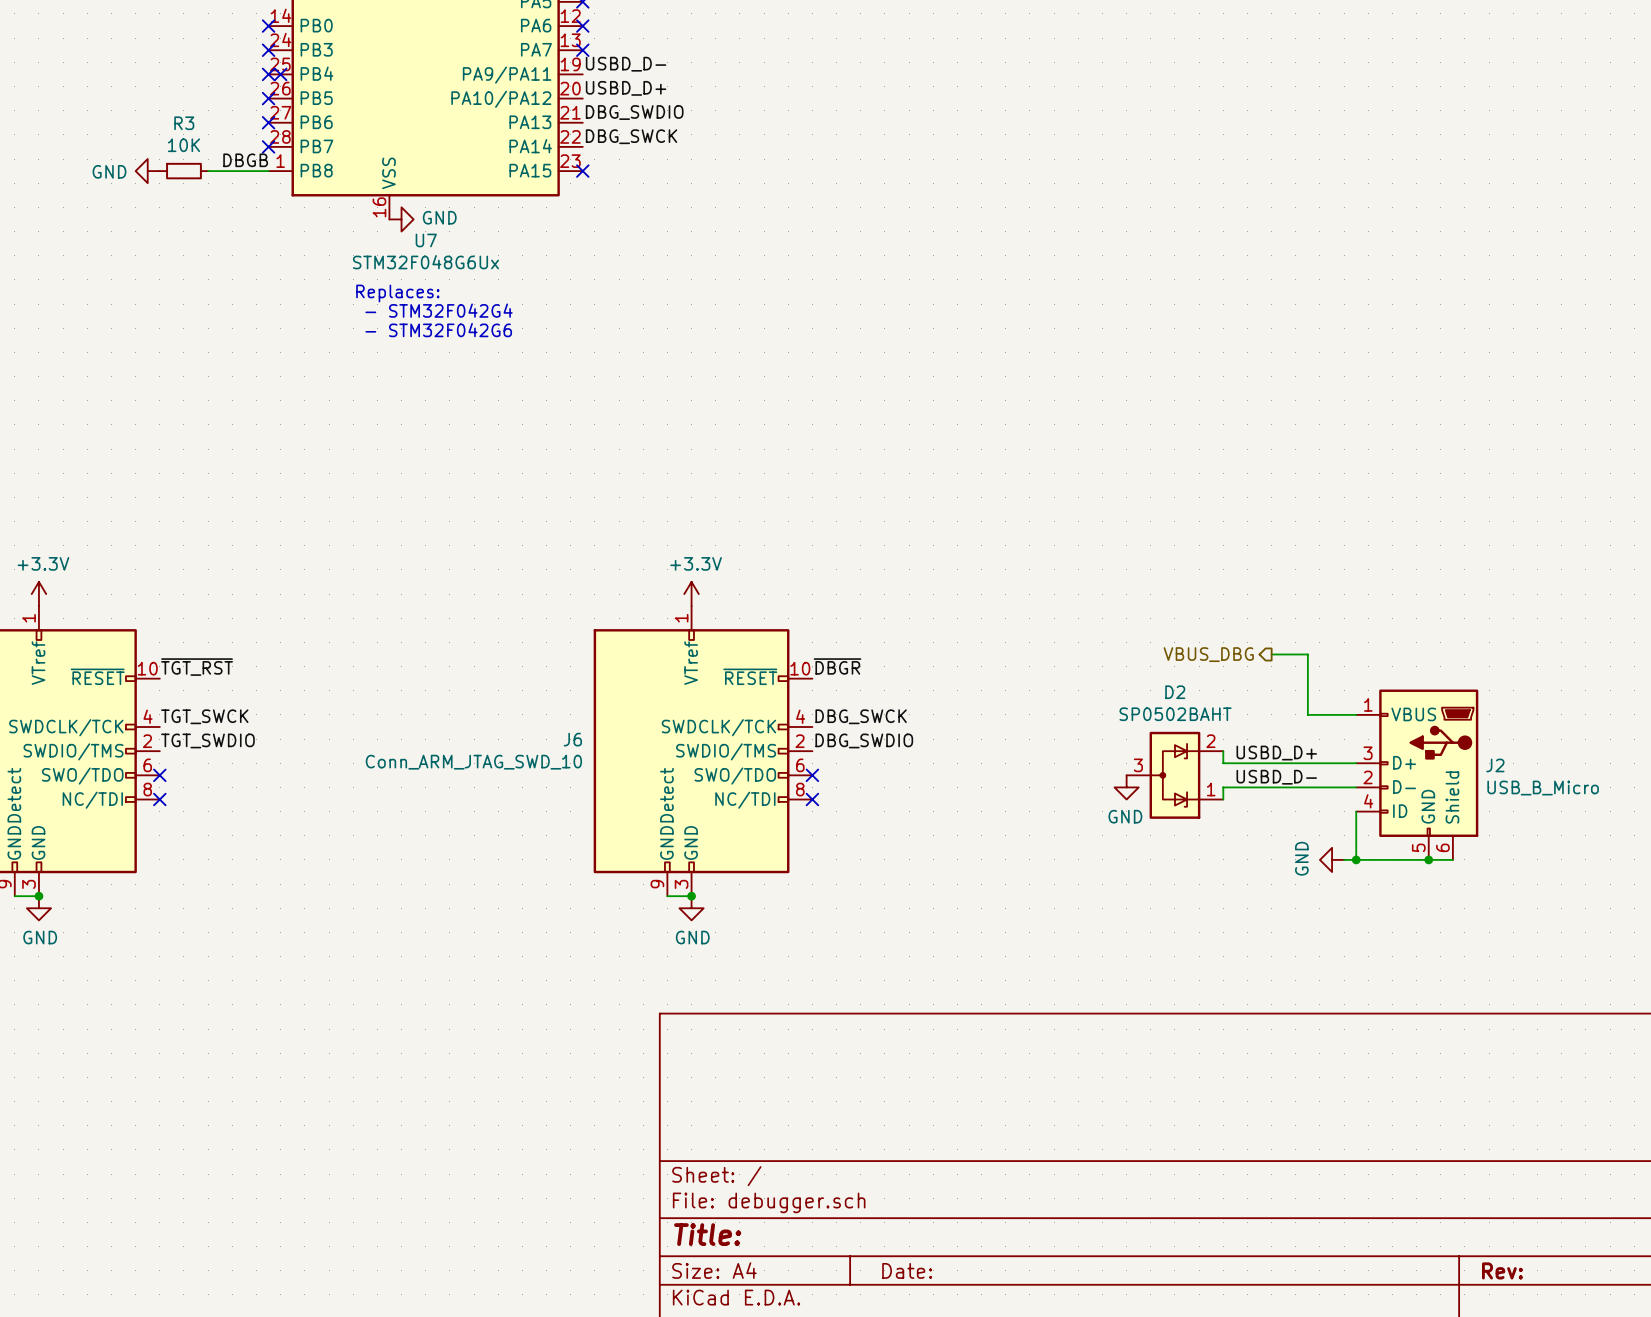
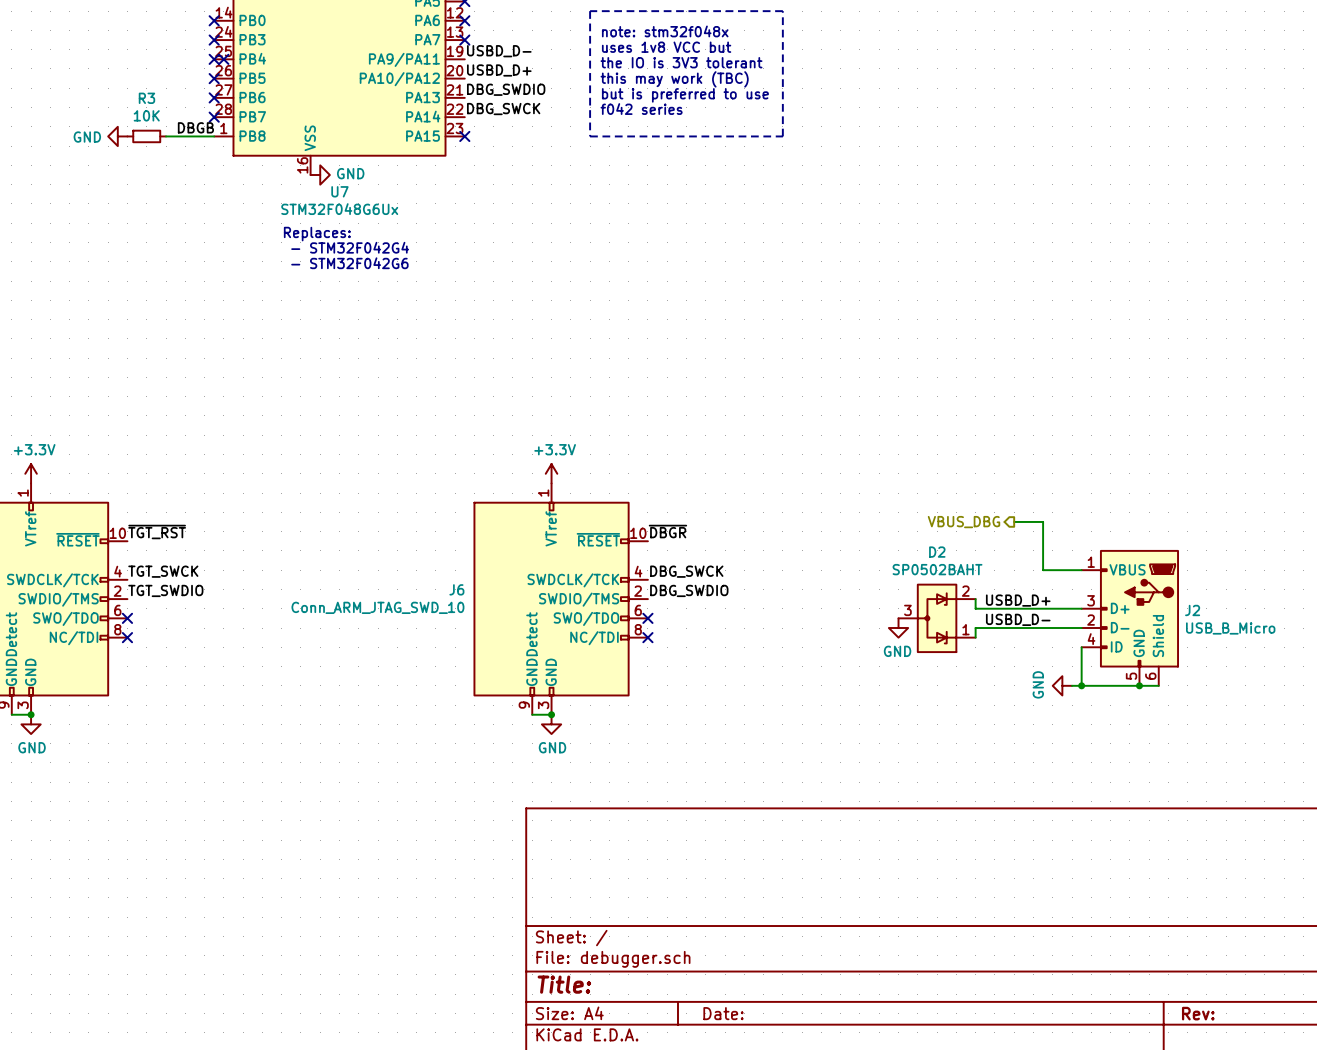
line: none -> (590, 11) (590, 136) (782, 136) (782, 11) (590, 11)
text: none -> note: stm32f048x (665, 31)
text: none -> uses 1v8 VCC but (666, 47)
text: none -> the IO is 3V3 tolerant (681, 62)
text: none -> this may work (TBC) (674, 79)
text: none -> but is preferred to use (685, 95)
text: none -> f042 series (641, 109)

